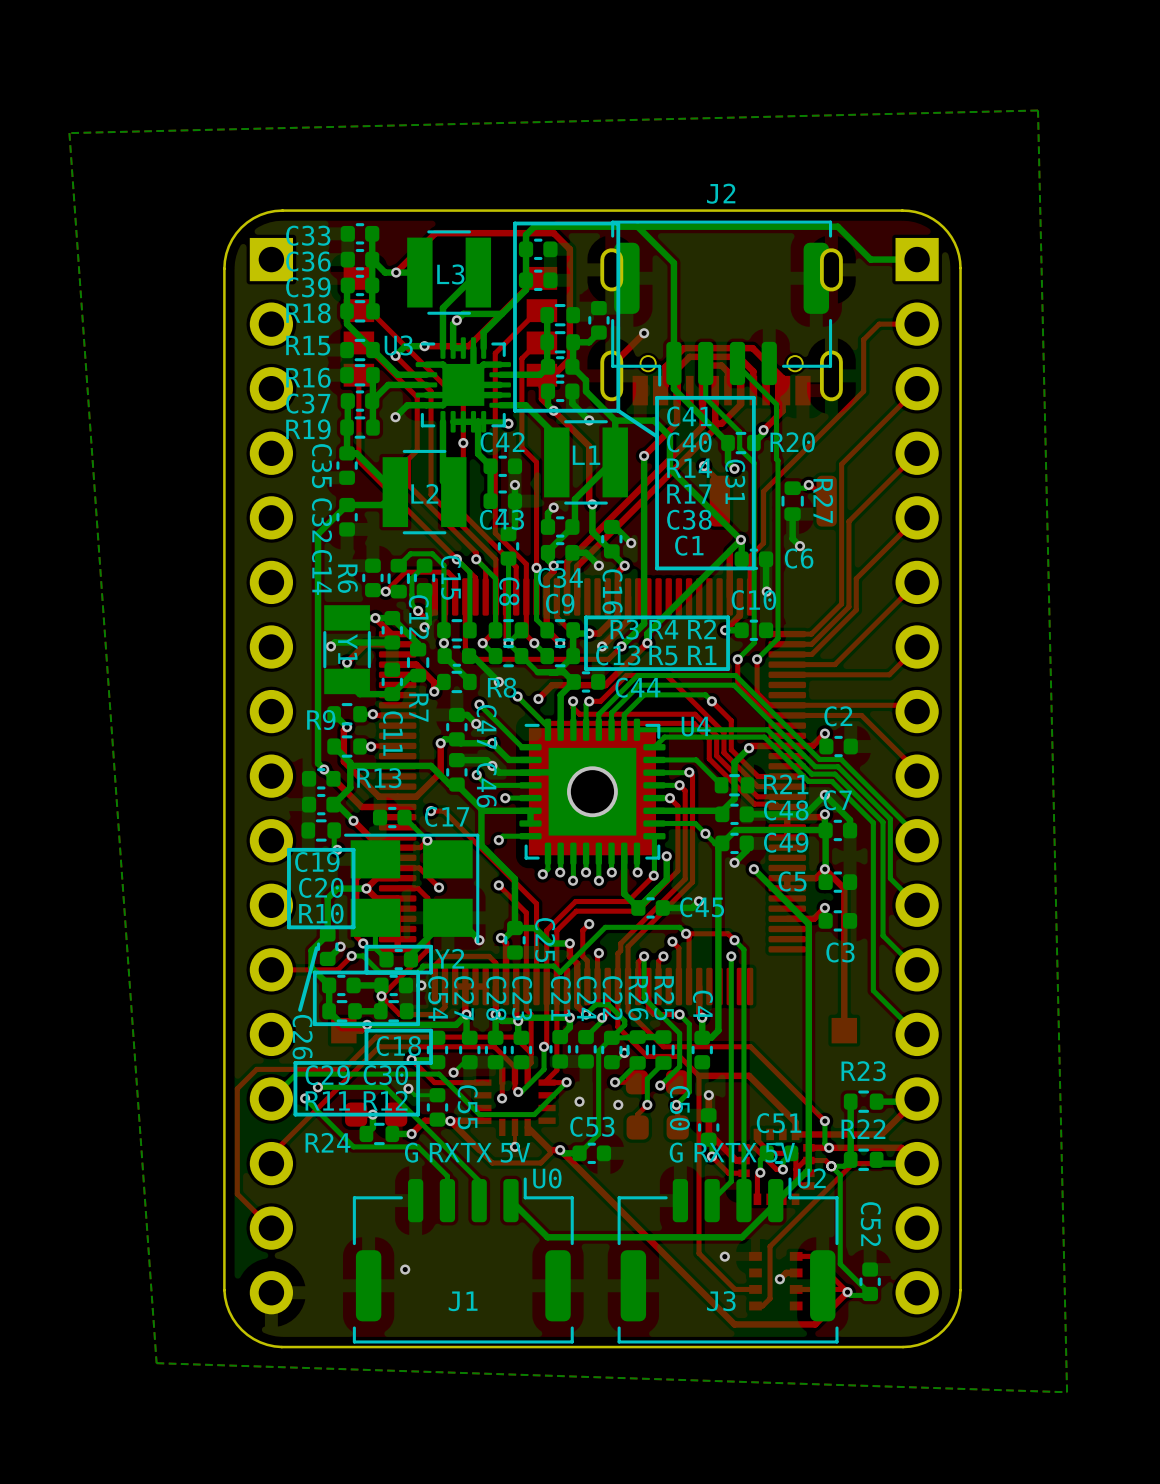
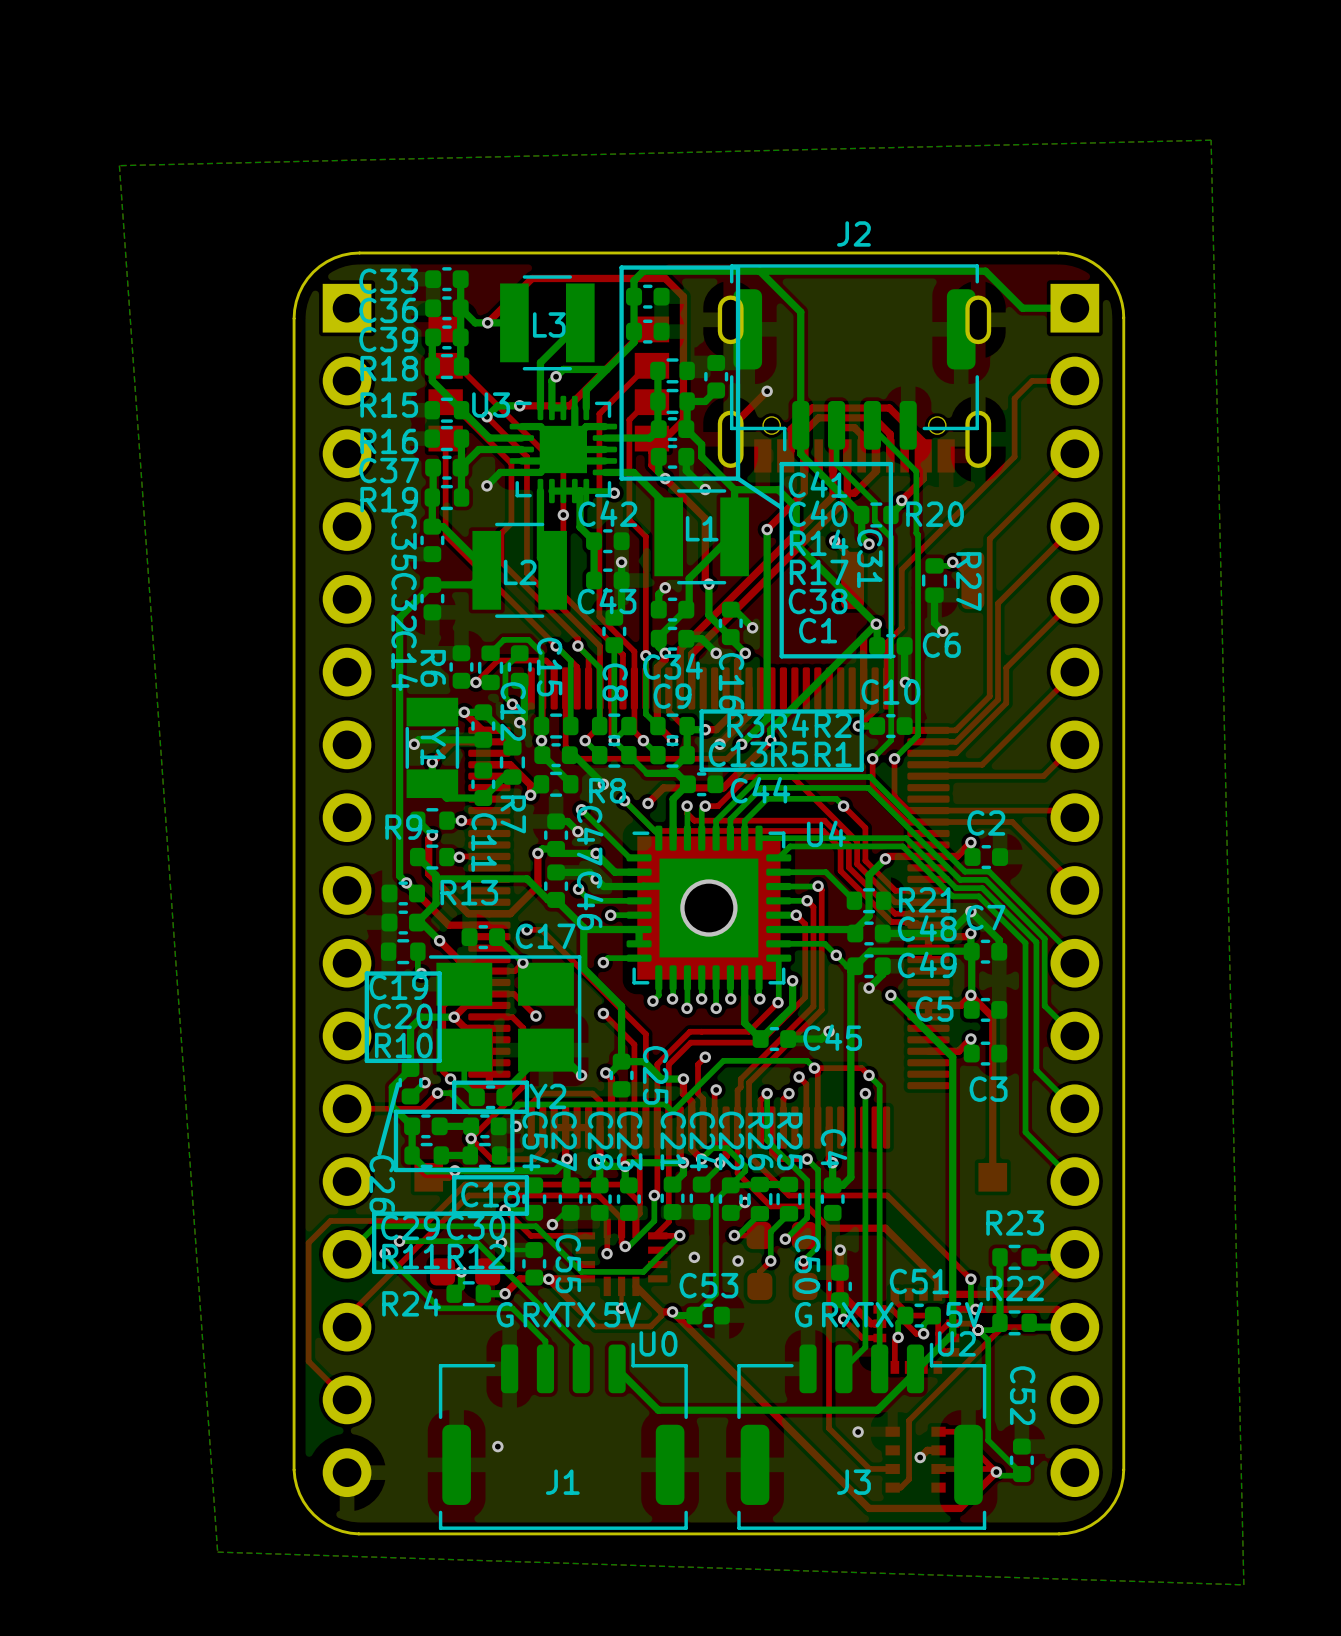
text position: 5V (780, 1152) -> 5V (964, 1314)

